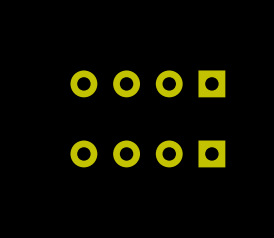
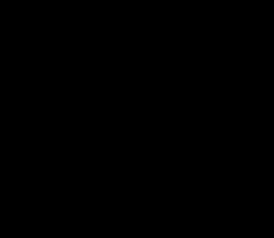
part: (147, 83) -> none
part: (147, 153) -> none

